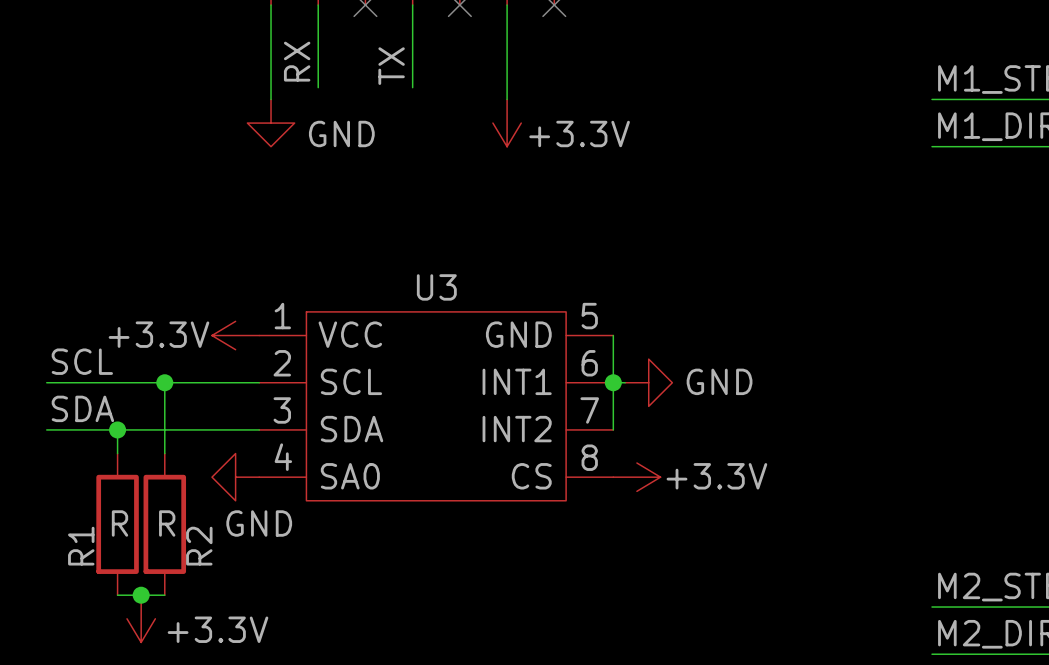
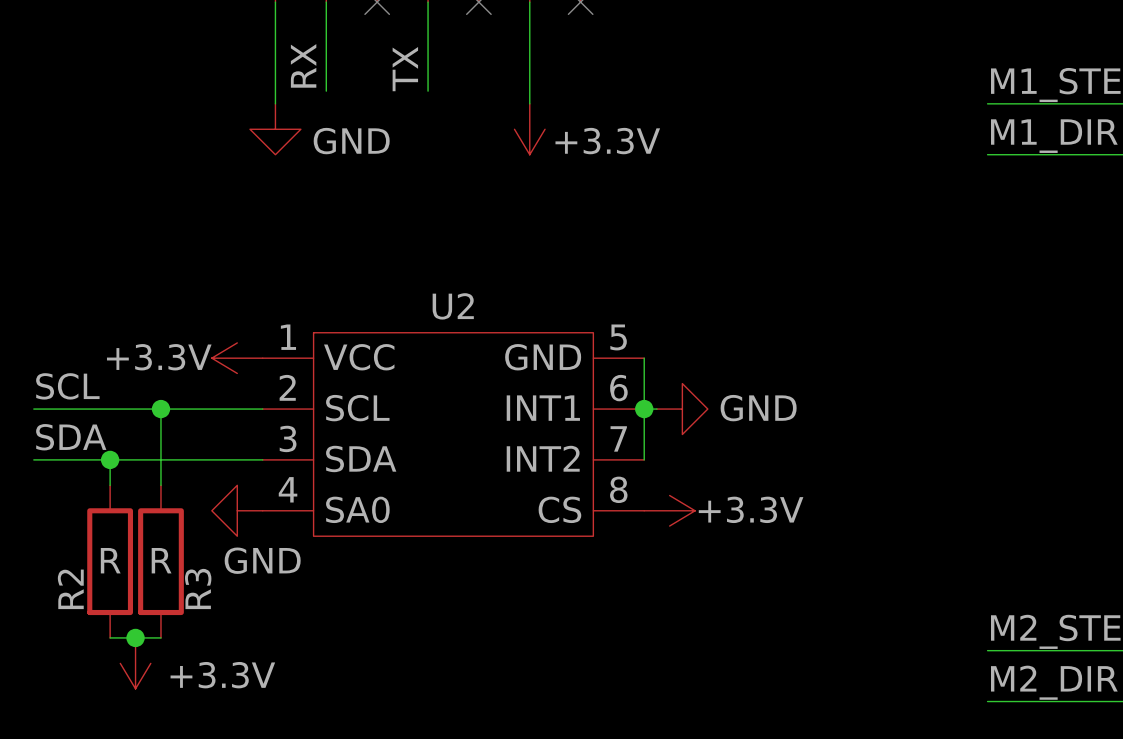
U3 name: U3 (436, 287) -> U2 (453, 306)
R1 name: R1 (81, 546) -> R2 (70, 589)
R2 name: R2 (199, 546) -> R3 (198, 588)

